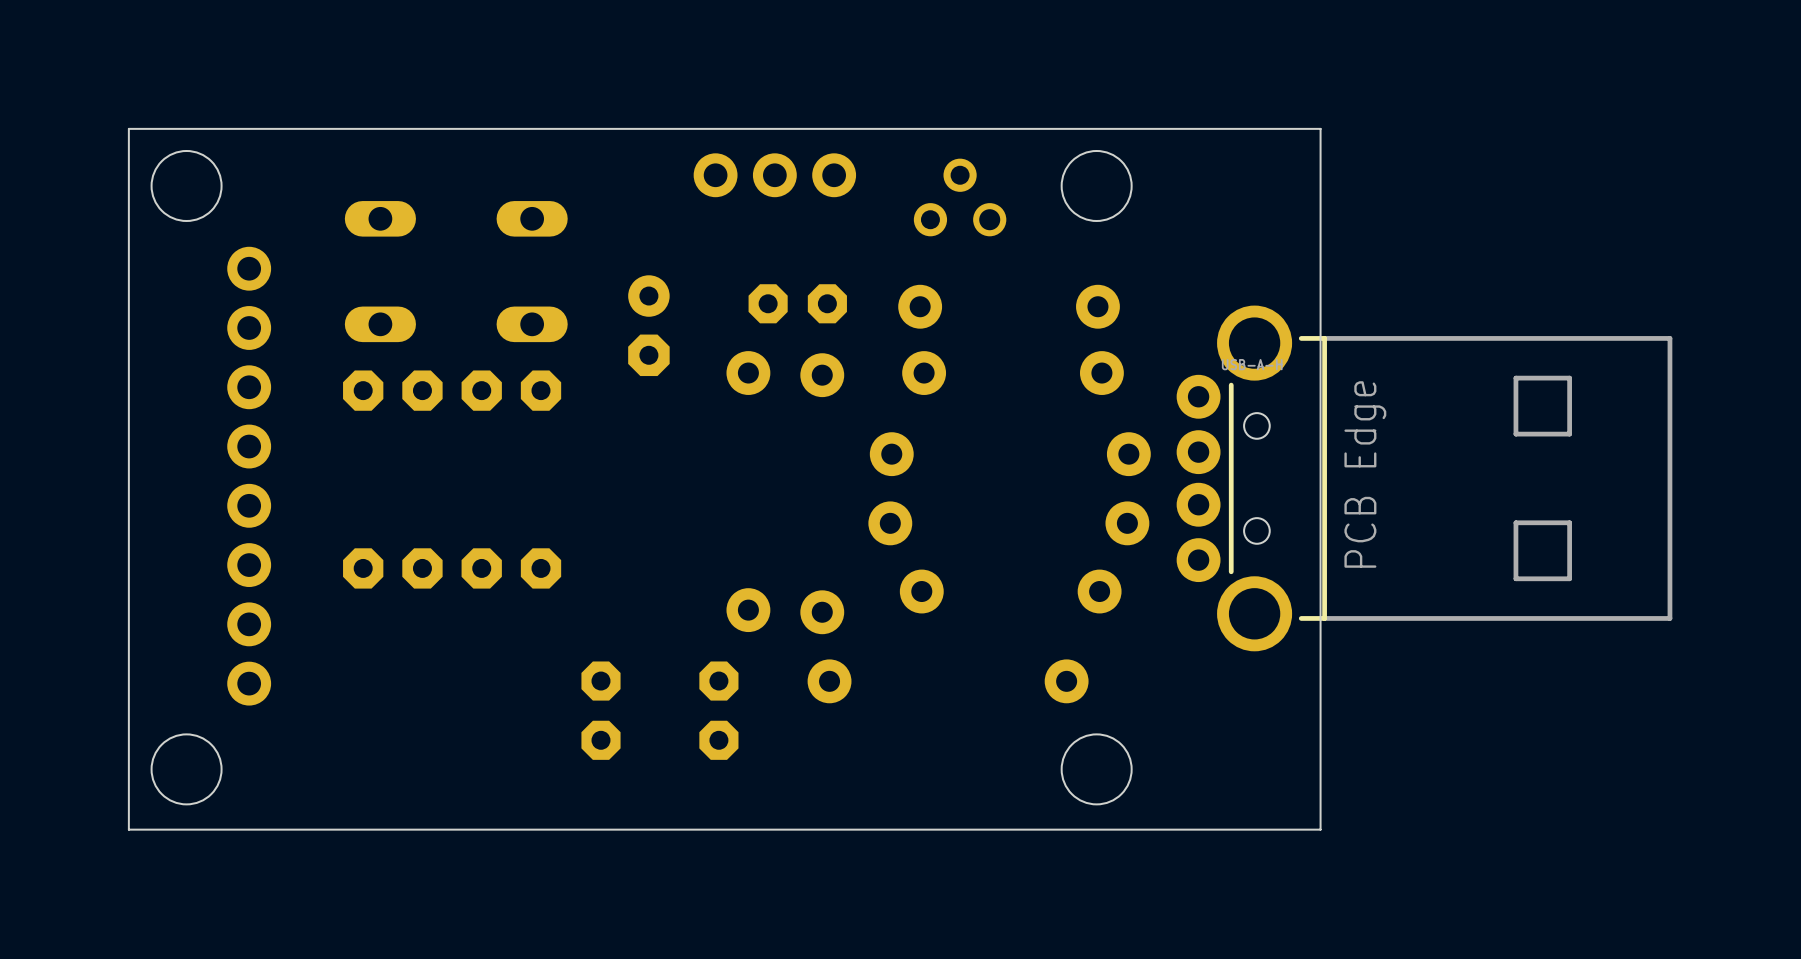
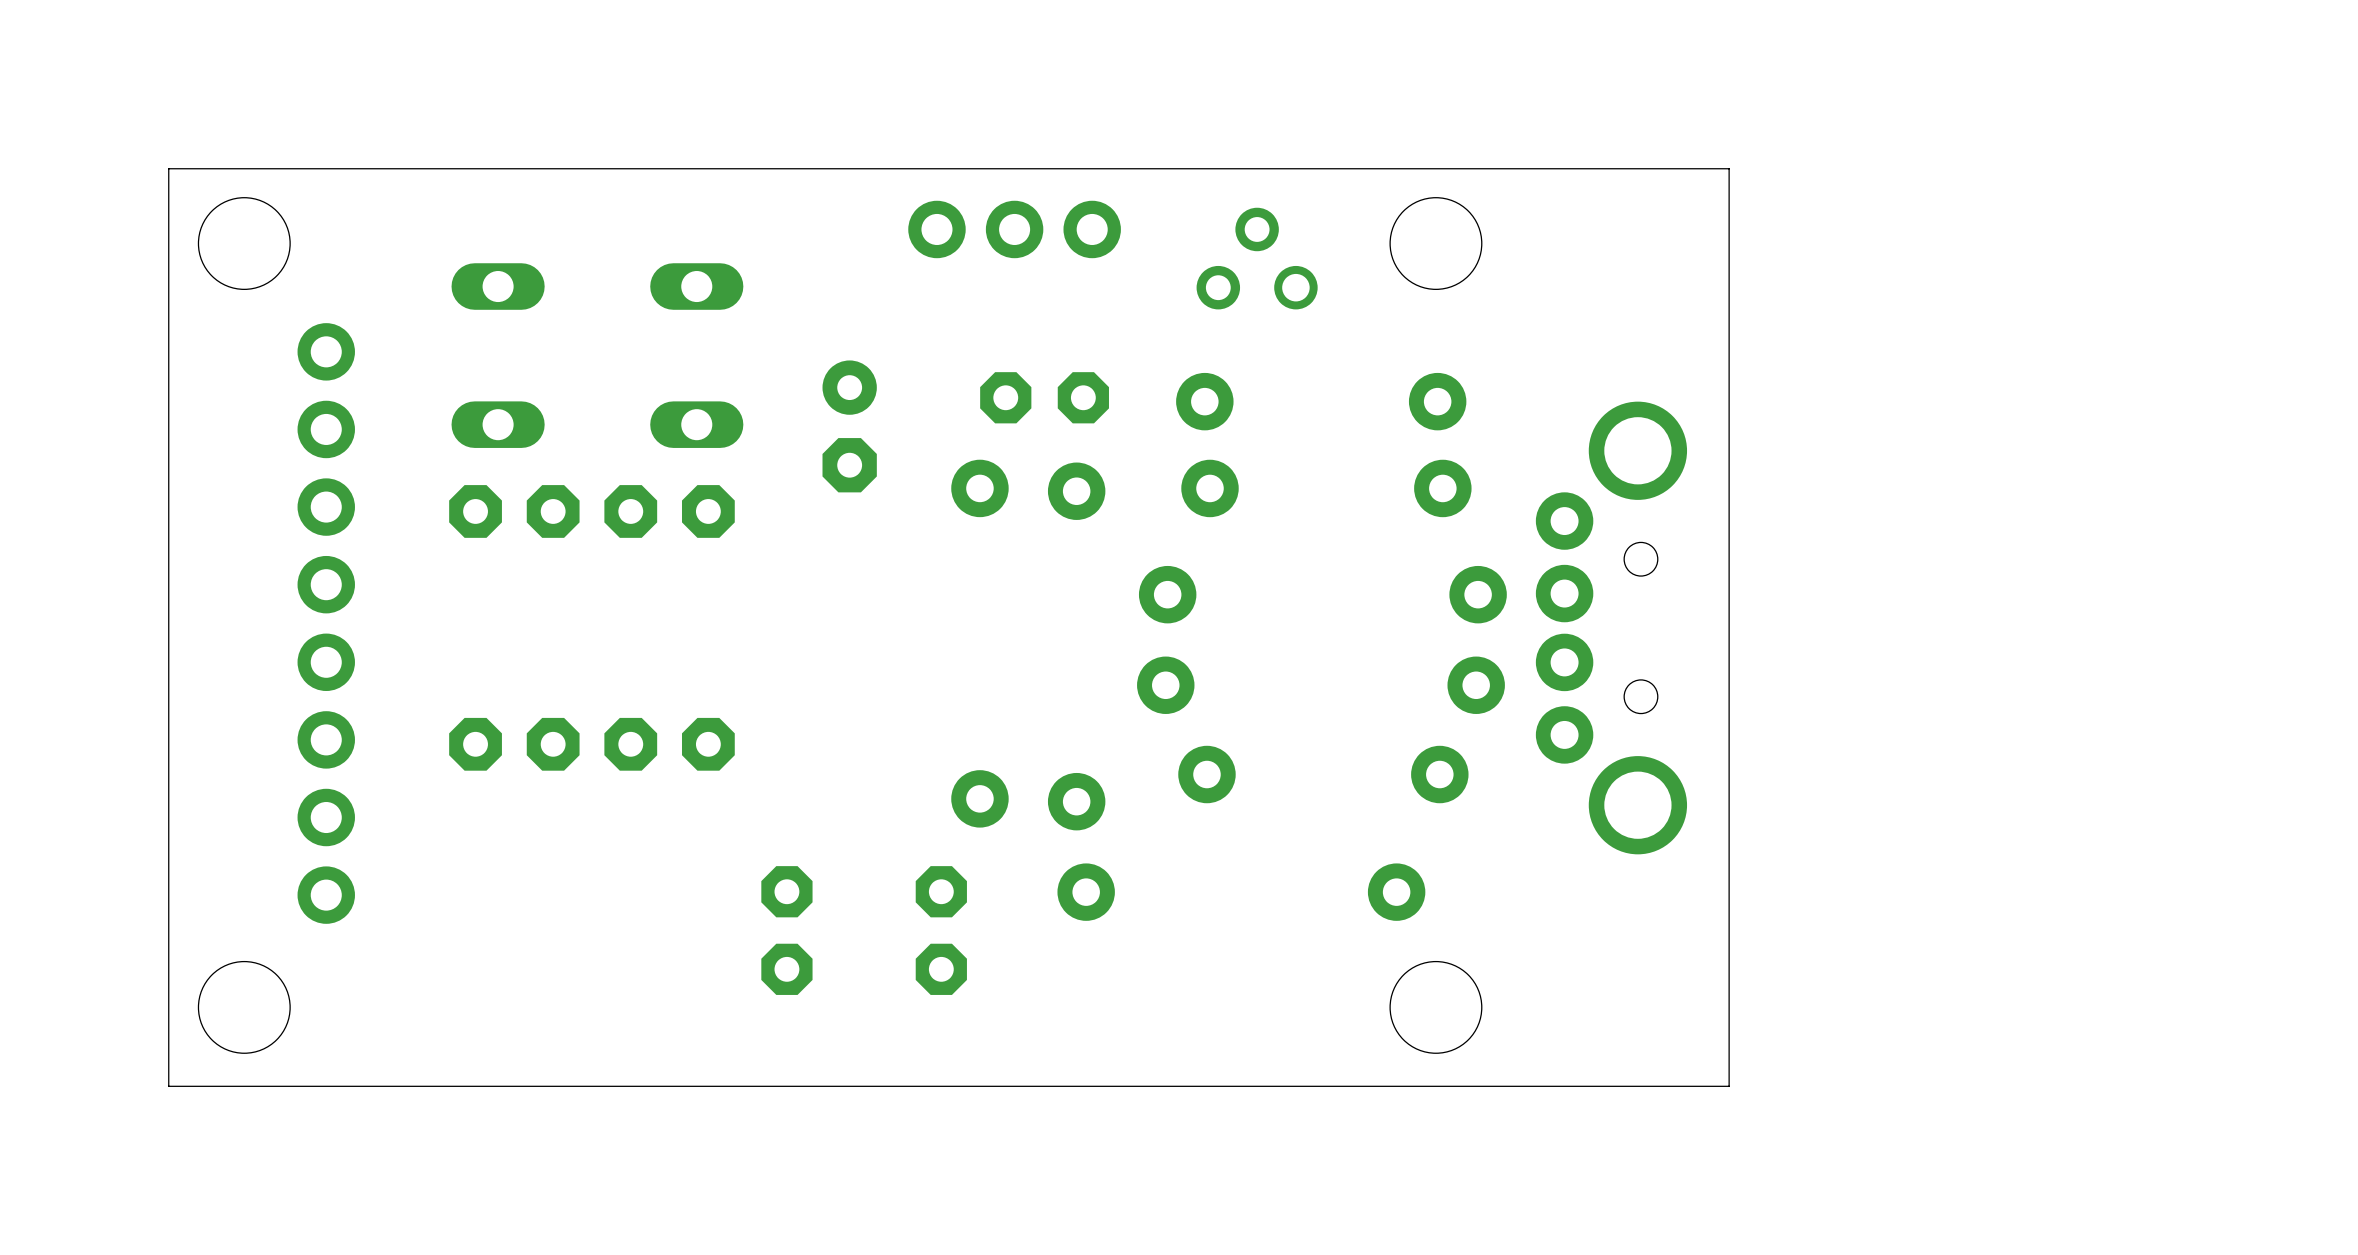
part side: bottom (1424, 478) -> top (1611, 627)

